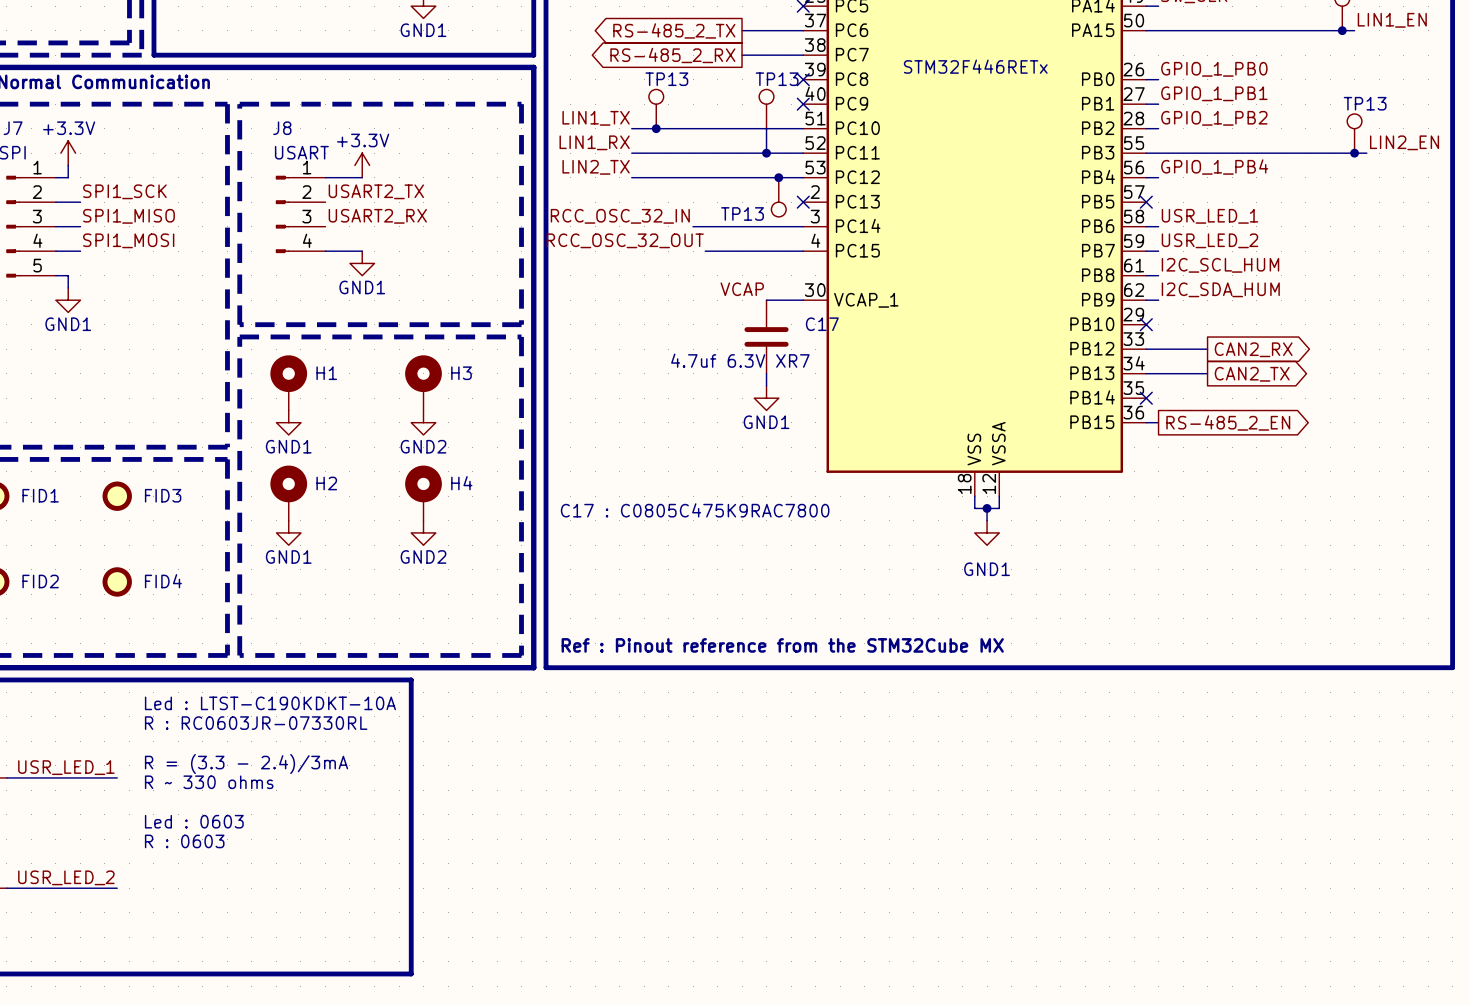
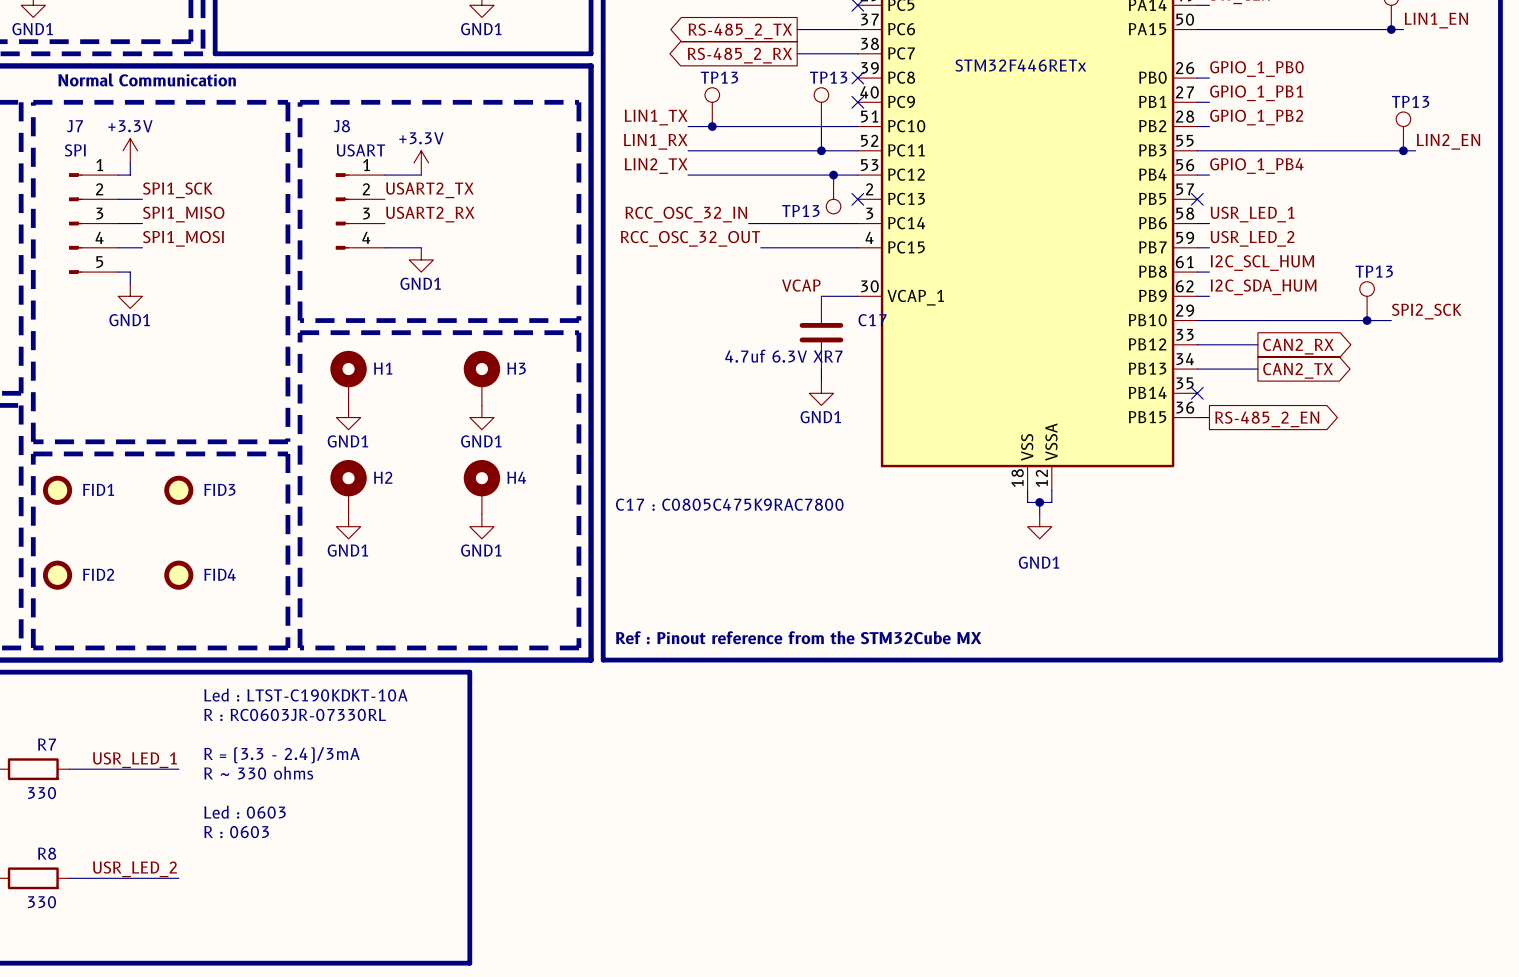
TP13: none -> (1367, 301)
label: none -> SPI2_SCK (1426, 311)
wire: none -> (1197, 320) (1391, 320)
no-connect mark: (1146, 324) -> none
junction: none -> (1367, 320)
power symbol: GND2 (423, 422) -> GND1 (481, 417)
power symbol: GND2 (423, 532) -> GND1 (481, 526)

